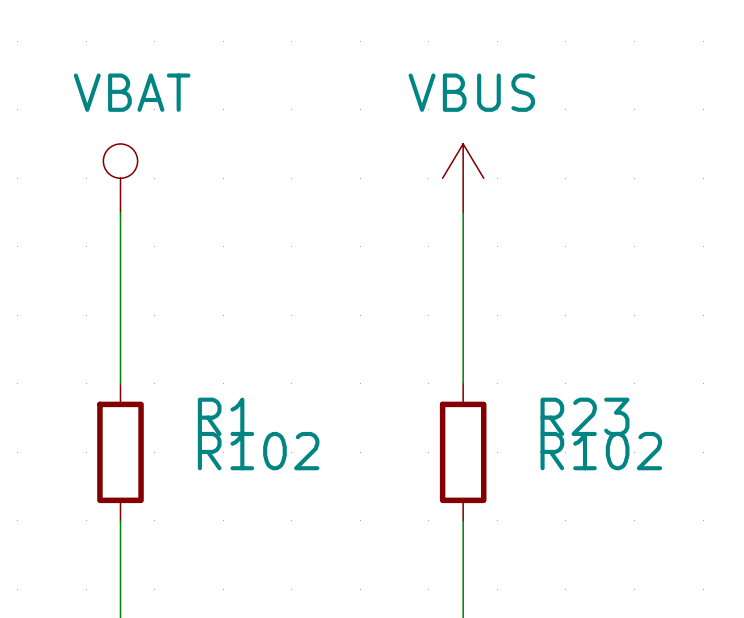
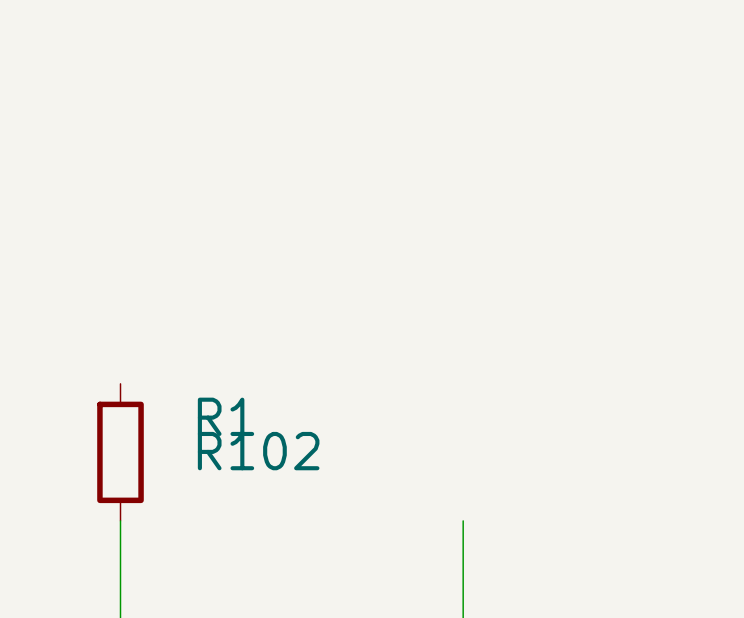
power symbol: VBAT (120, 178) -> none
power symbol: VBUS (463, 178) -> none
wire: (120, 212) (120, 383) -> none
wire: (463, 212) (463, 383) -> none
R23: R102 (463, 452) -> none

